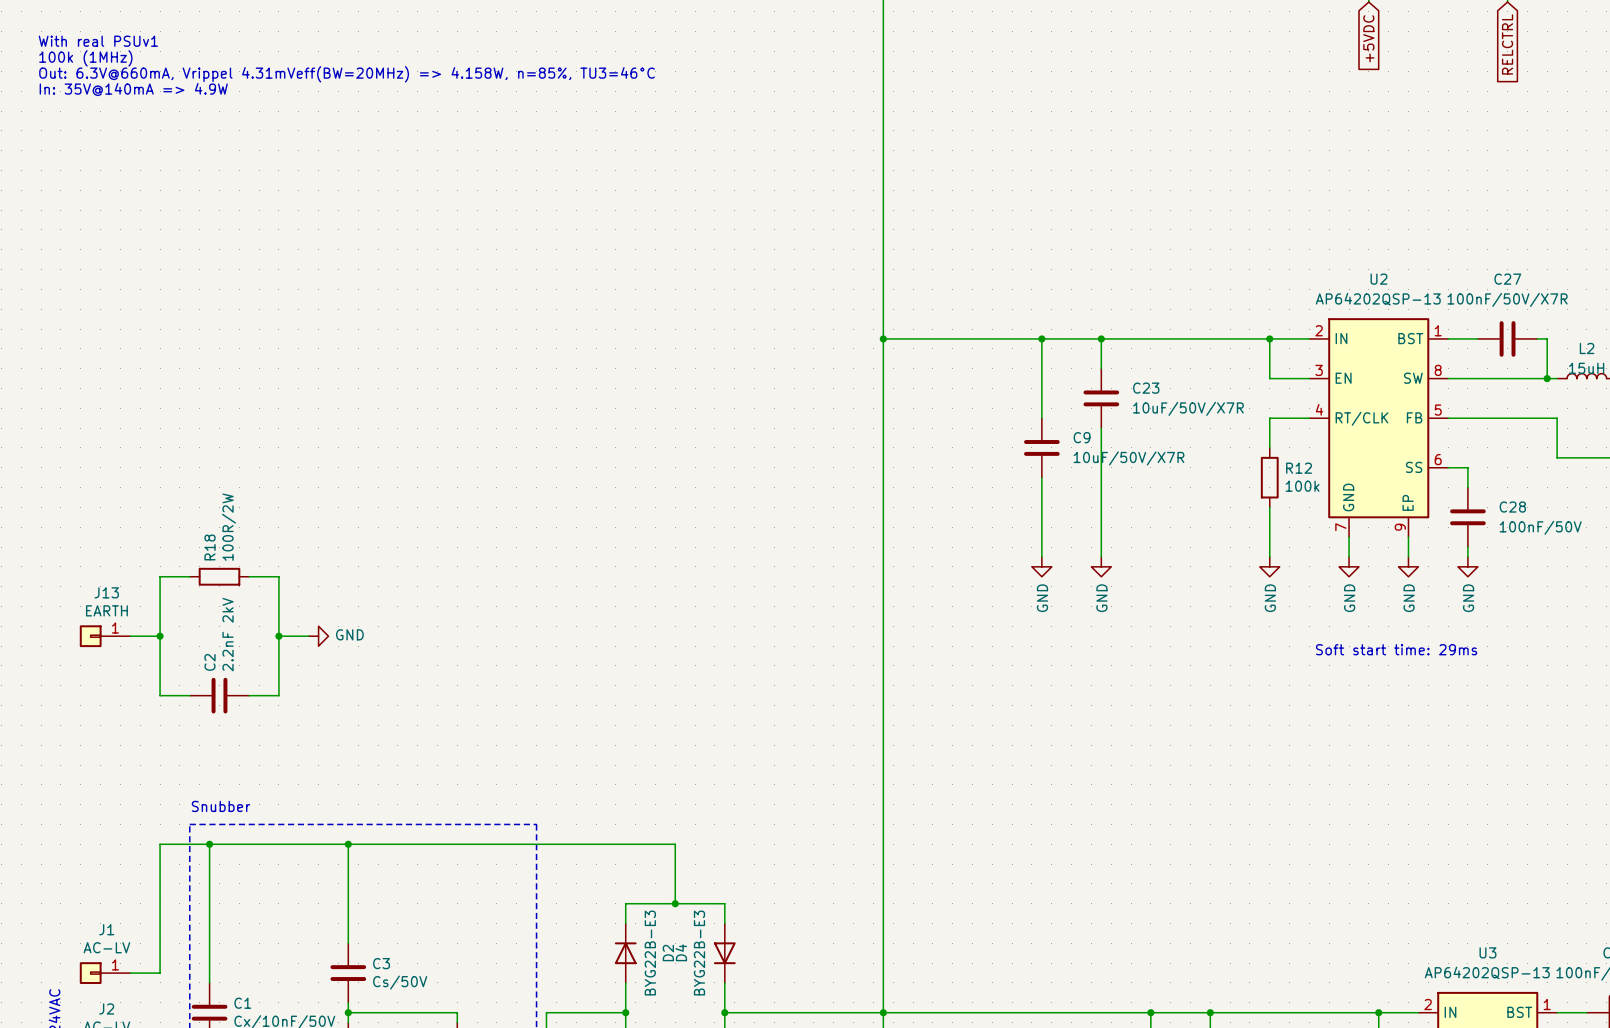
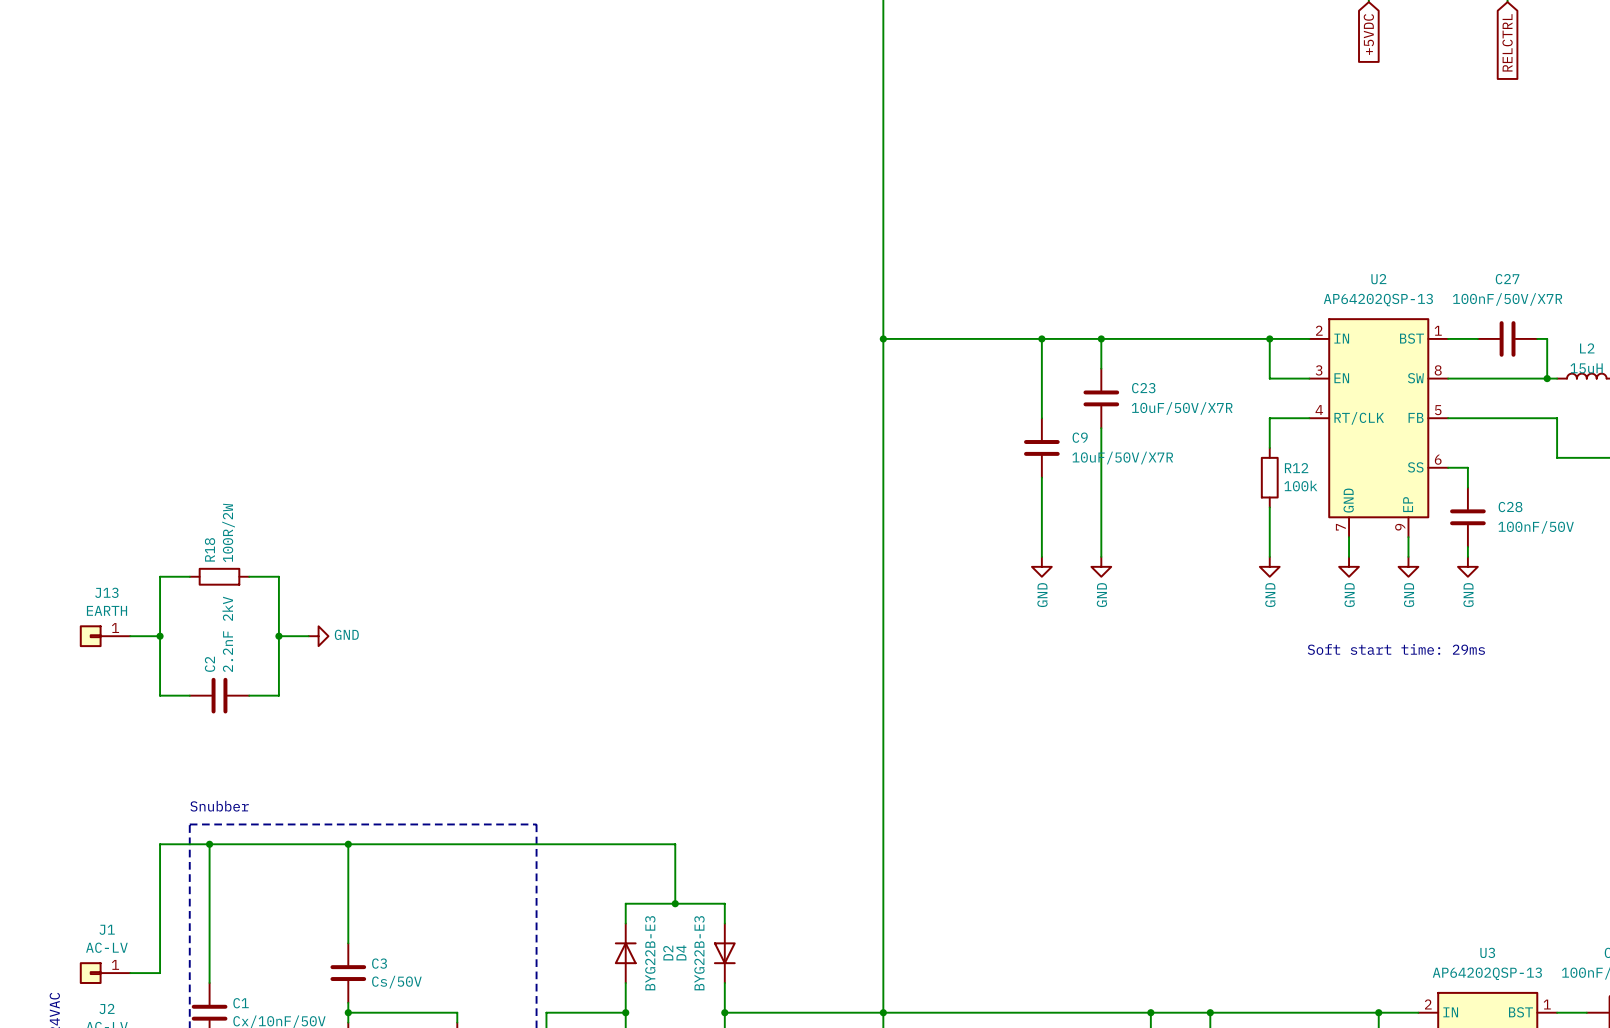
text: With real PSUv1 (98, 41) -> none
text: 100k (1MHz) (85, 58) -> none
text: Out: 6.3V@660mA, Vrippel 4.31mVeff(BW=20MHz) => 4.158W, n=85%, TU3=46°C (347, 74) -> none
text: In: 35V@140mA => 4.9W (133, 89) -> none

